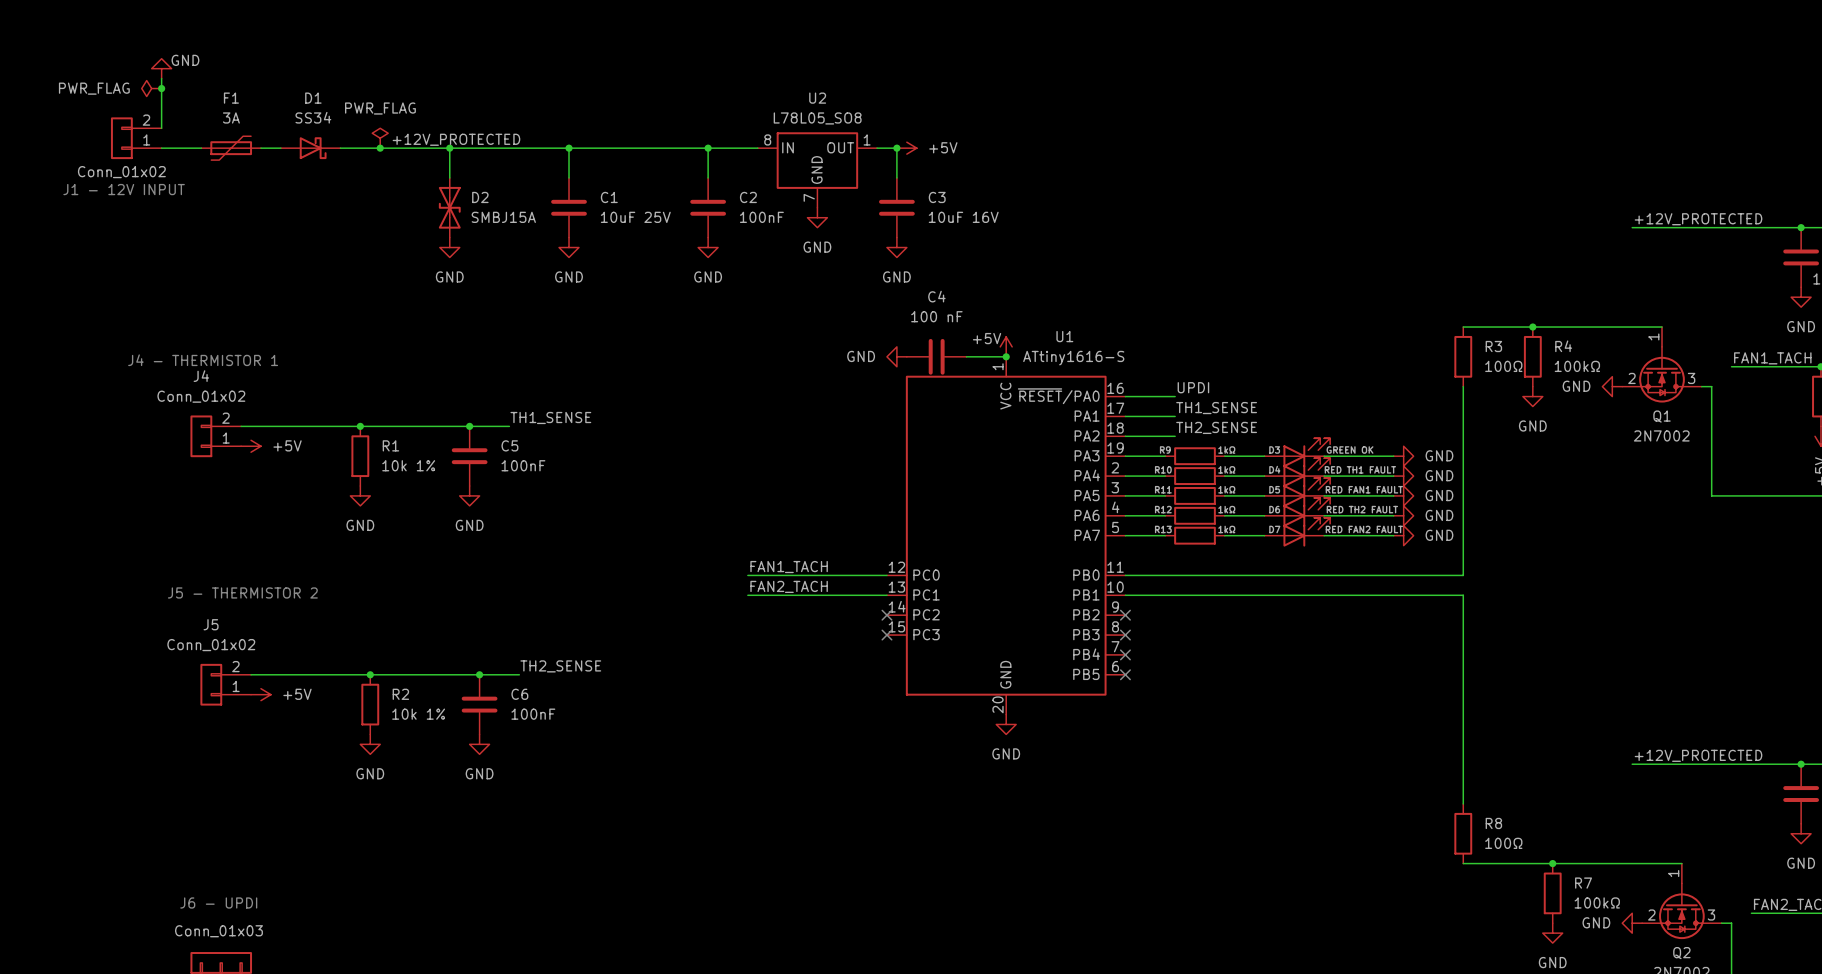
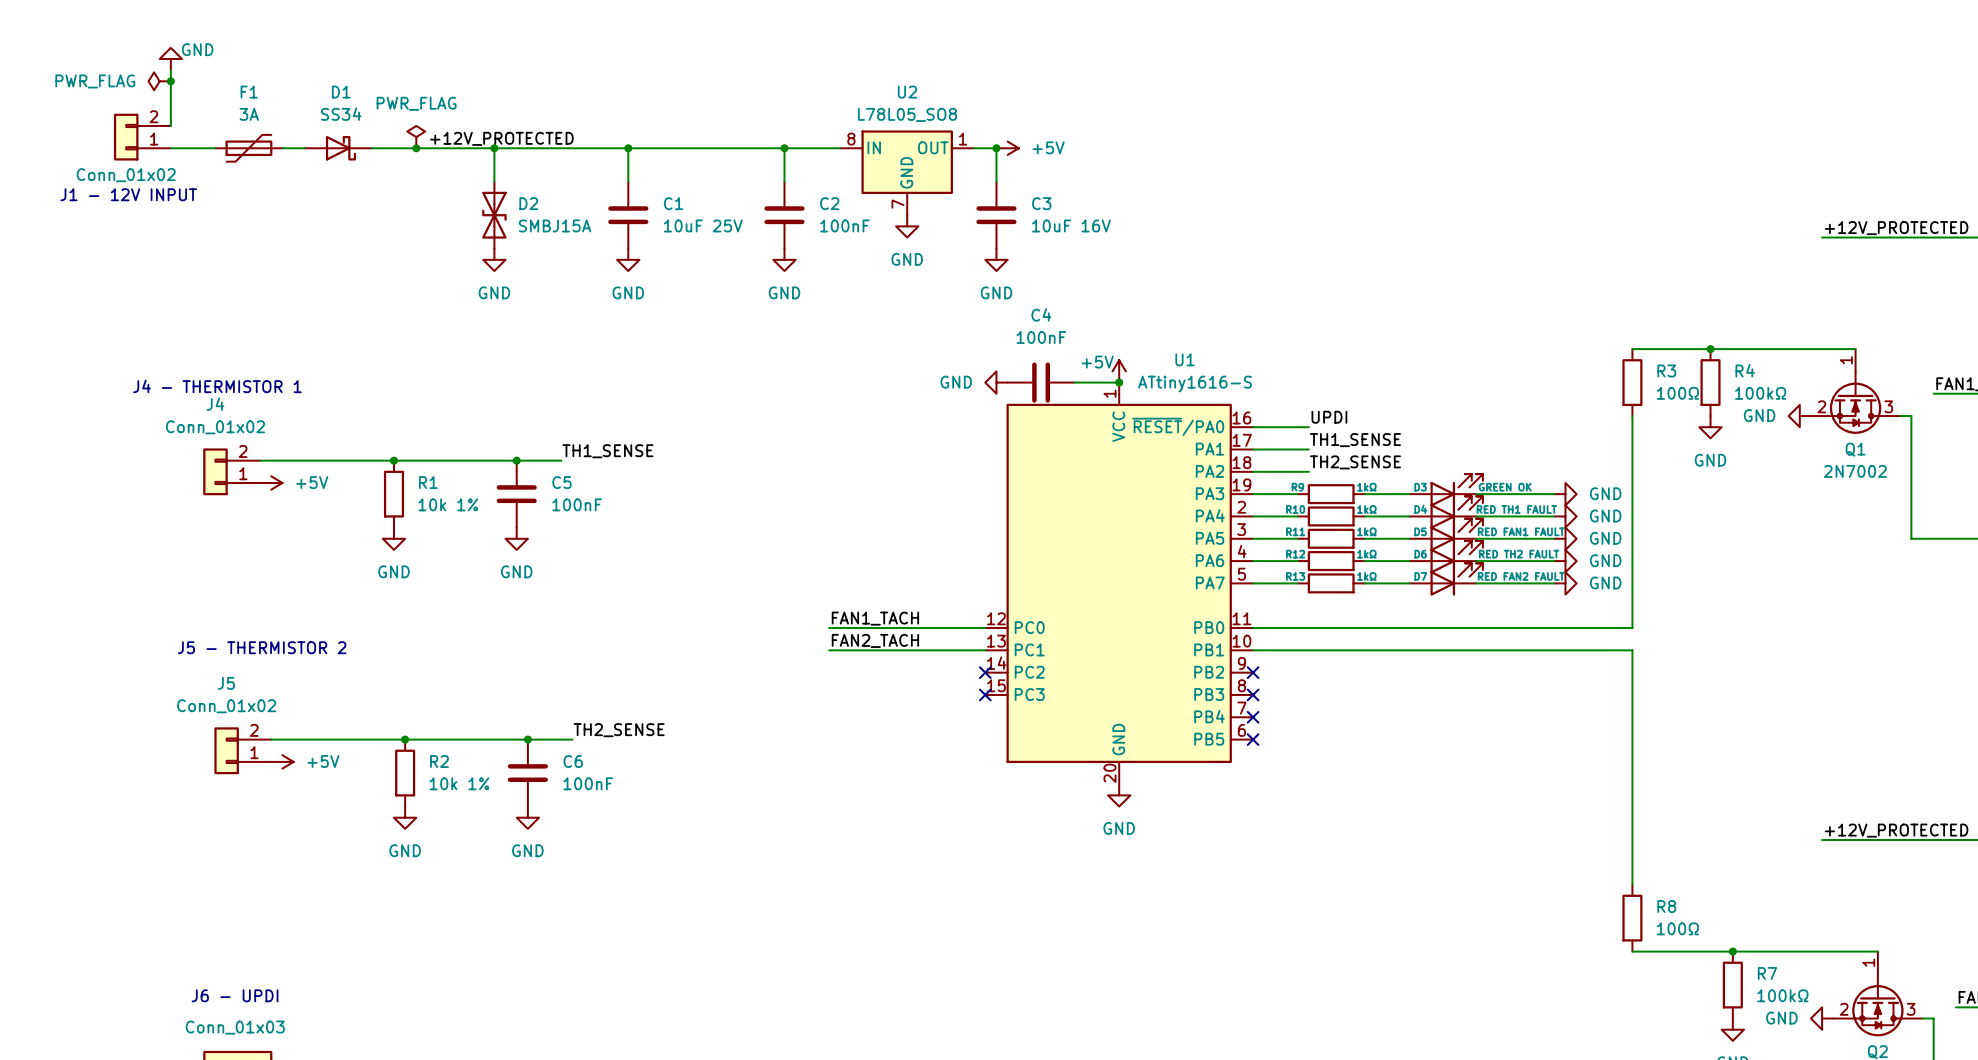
C4 value: 100 nF (936, 316) -> 100nF (1041, 337)

